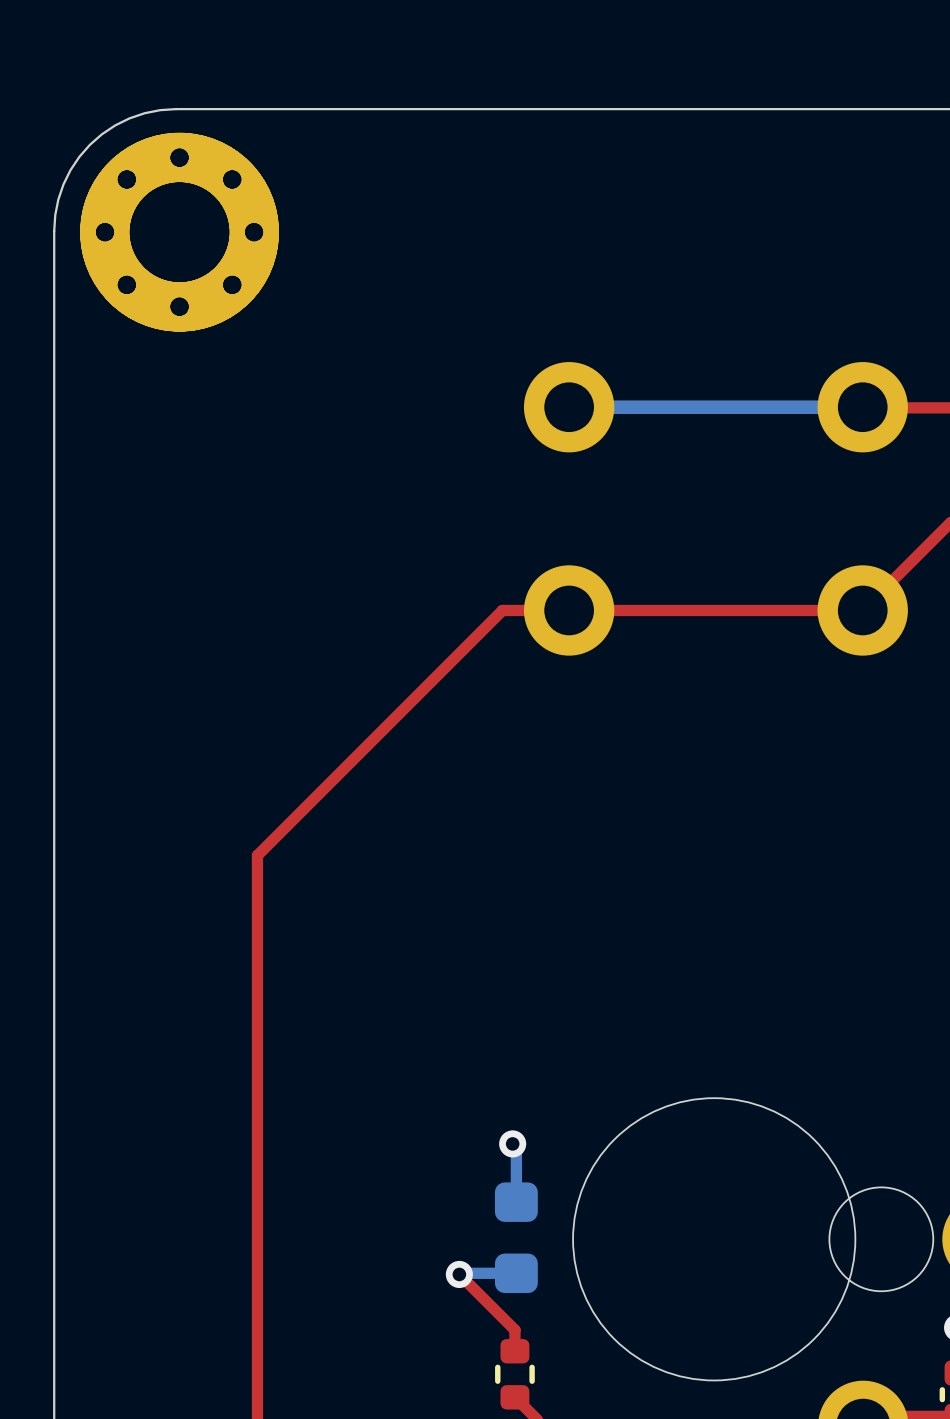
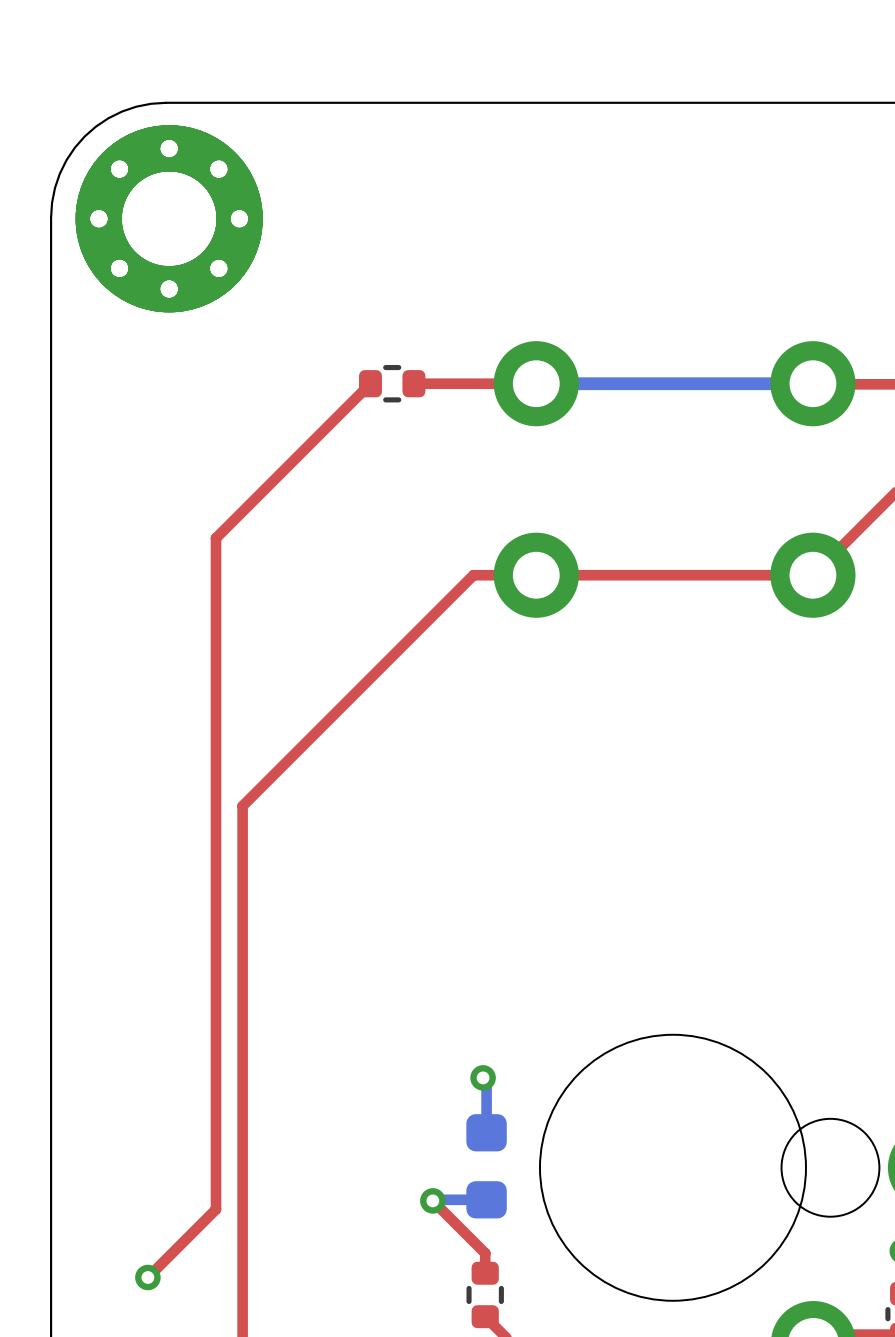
top track: none -> (370, 383) (216, 538) (216, 1209) (147, 1277)
part: none -> (392, 383)
top track: none -> (413, 383) (536, 383)
via: none -> (147, 1277)

